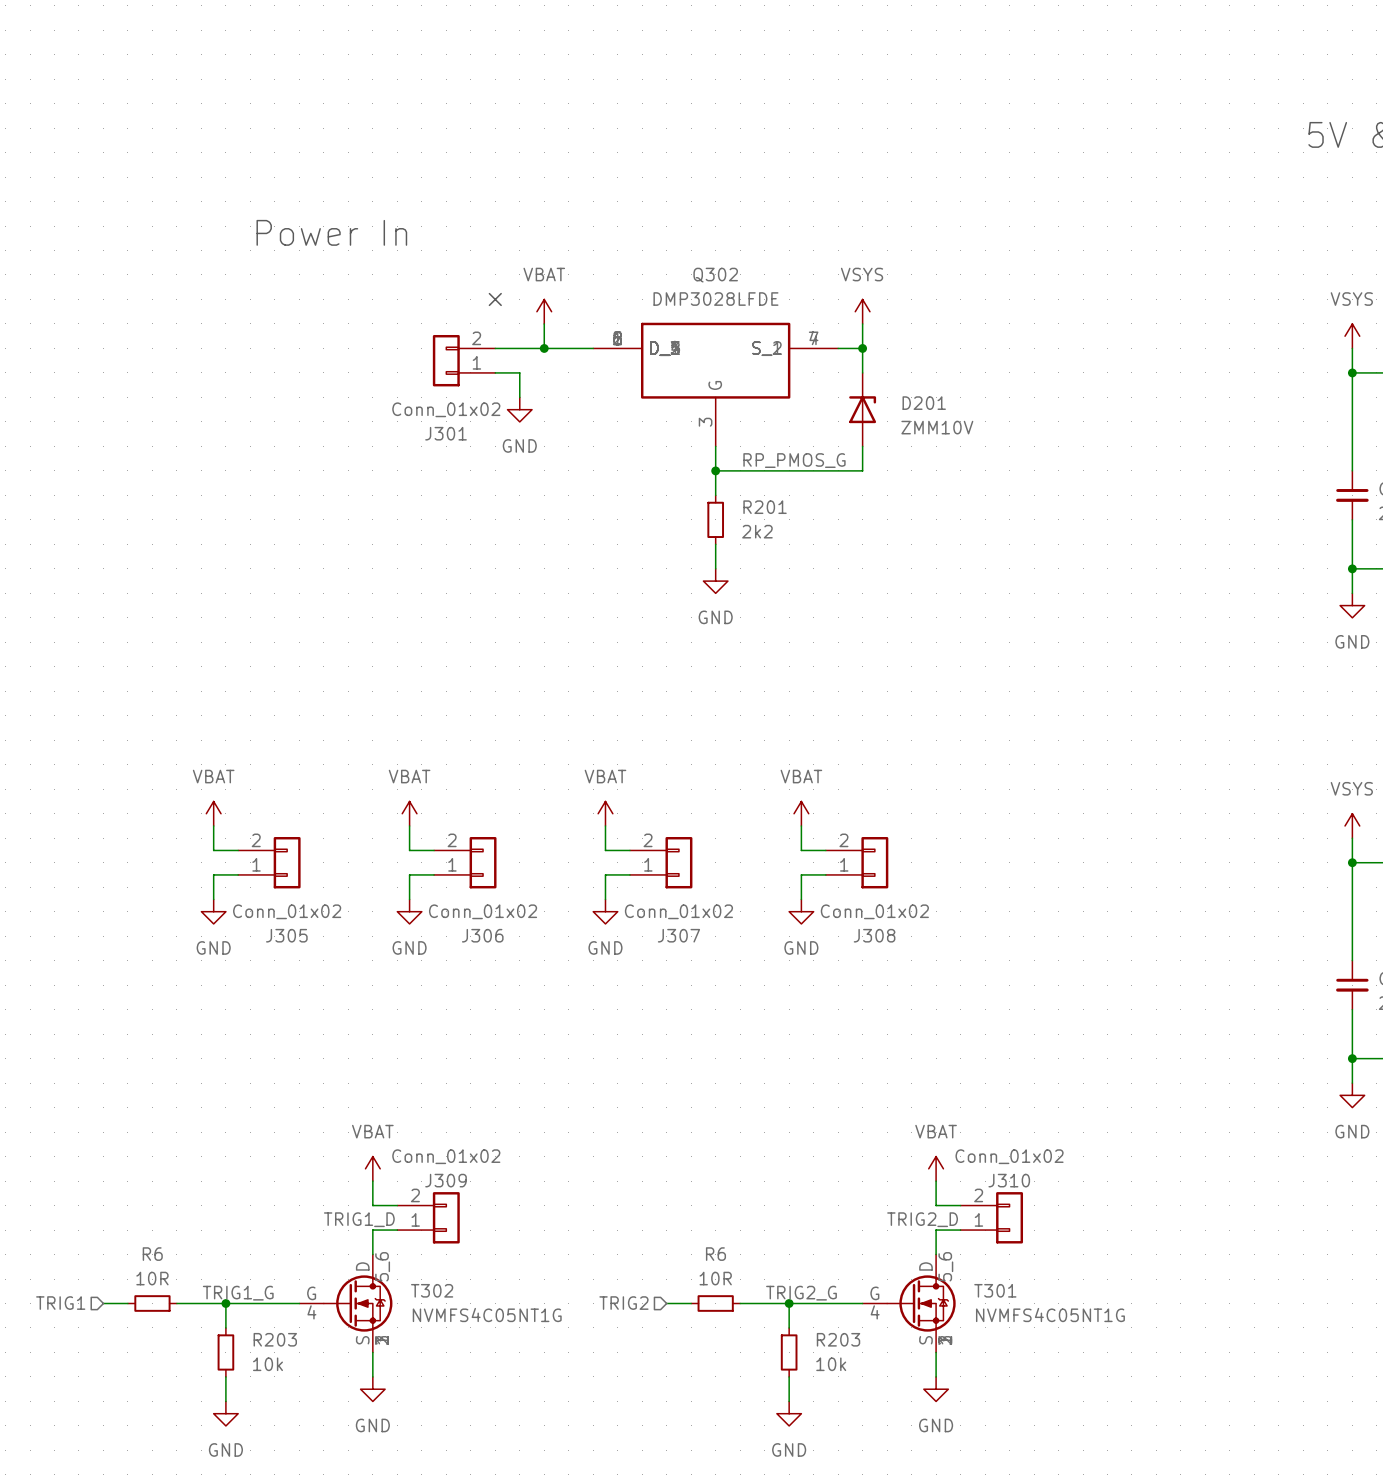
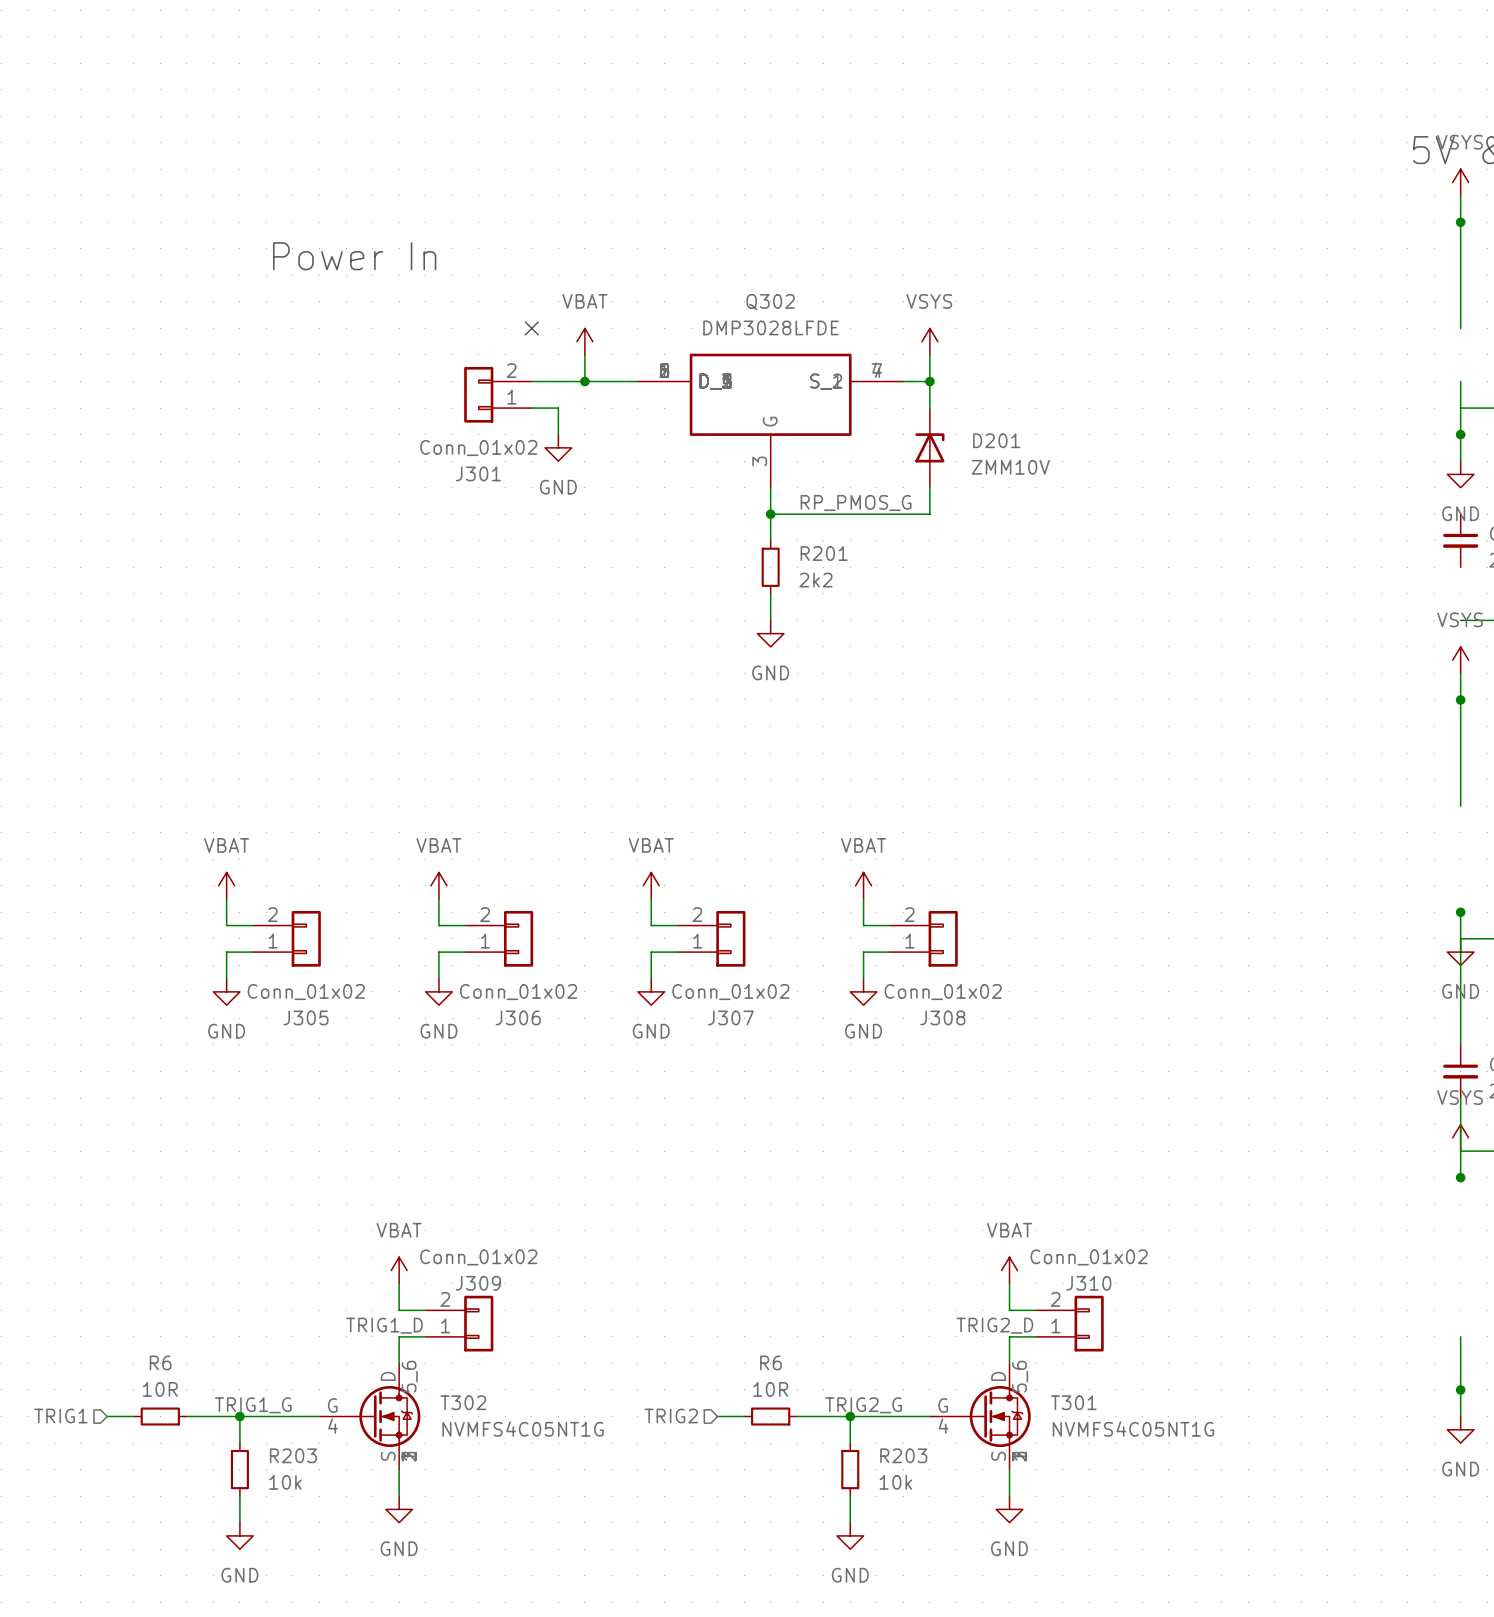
wire: none -> (1460, 195) (1460, 328)
junction: none -> (1460, 222)
power symbol position: VSYS (1352, 336) -> VSYS (1460, 182)
junction position: (1352, 372) -> (1460, 434)
wire: (1352, 421) (1352, 470) -> none
power symbol: none -> GND (1460, 474)
wire: (1352, 519) (1352, 593) -> none
junction: (1352, 568) -> none
power symbol: GND (1352, 605) -> VSYS (1460, 660)
wire: none -> (1460, 673) (1460, 806)
junction: none -> (1460, 699)
power symbol position: VSYS (1352, 825) -> VSYS (1460, 1137)
junction position: (1352, 862) -> (1460, 912)
power symbol: none -> GND (1460, 952)
junction position: (1352, 1058) -> (1460, 1177)
power symbol: GND (1352, 1095) -> none
wire: none -> (1460, 1336) (1460, 1416)
junction: none -> (1460, 1389)
power symbol: none -> GND (1460, 1429)

